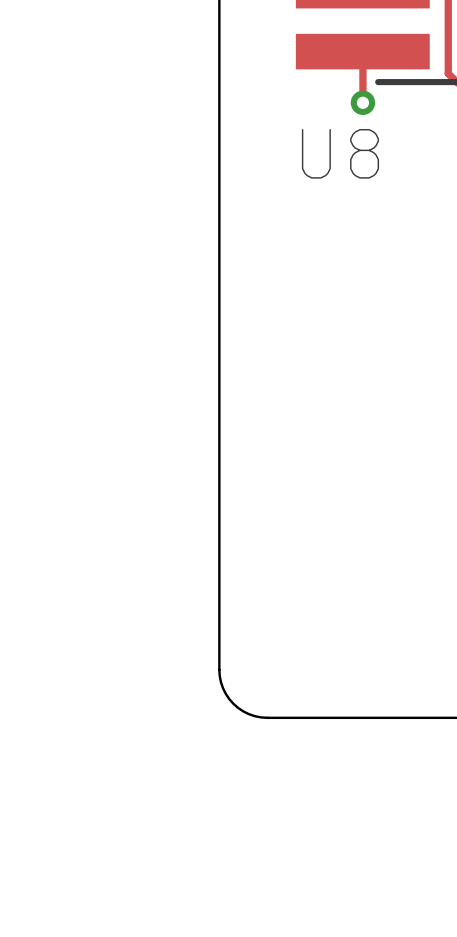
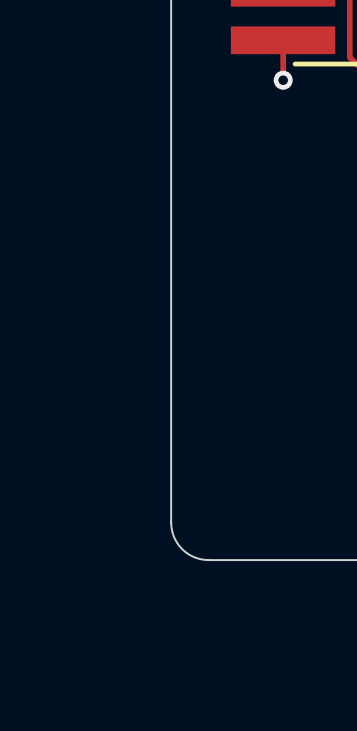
U8 name: U8 (340, 153) -> none

